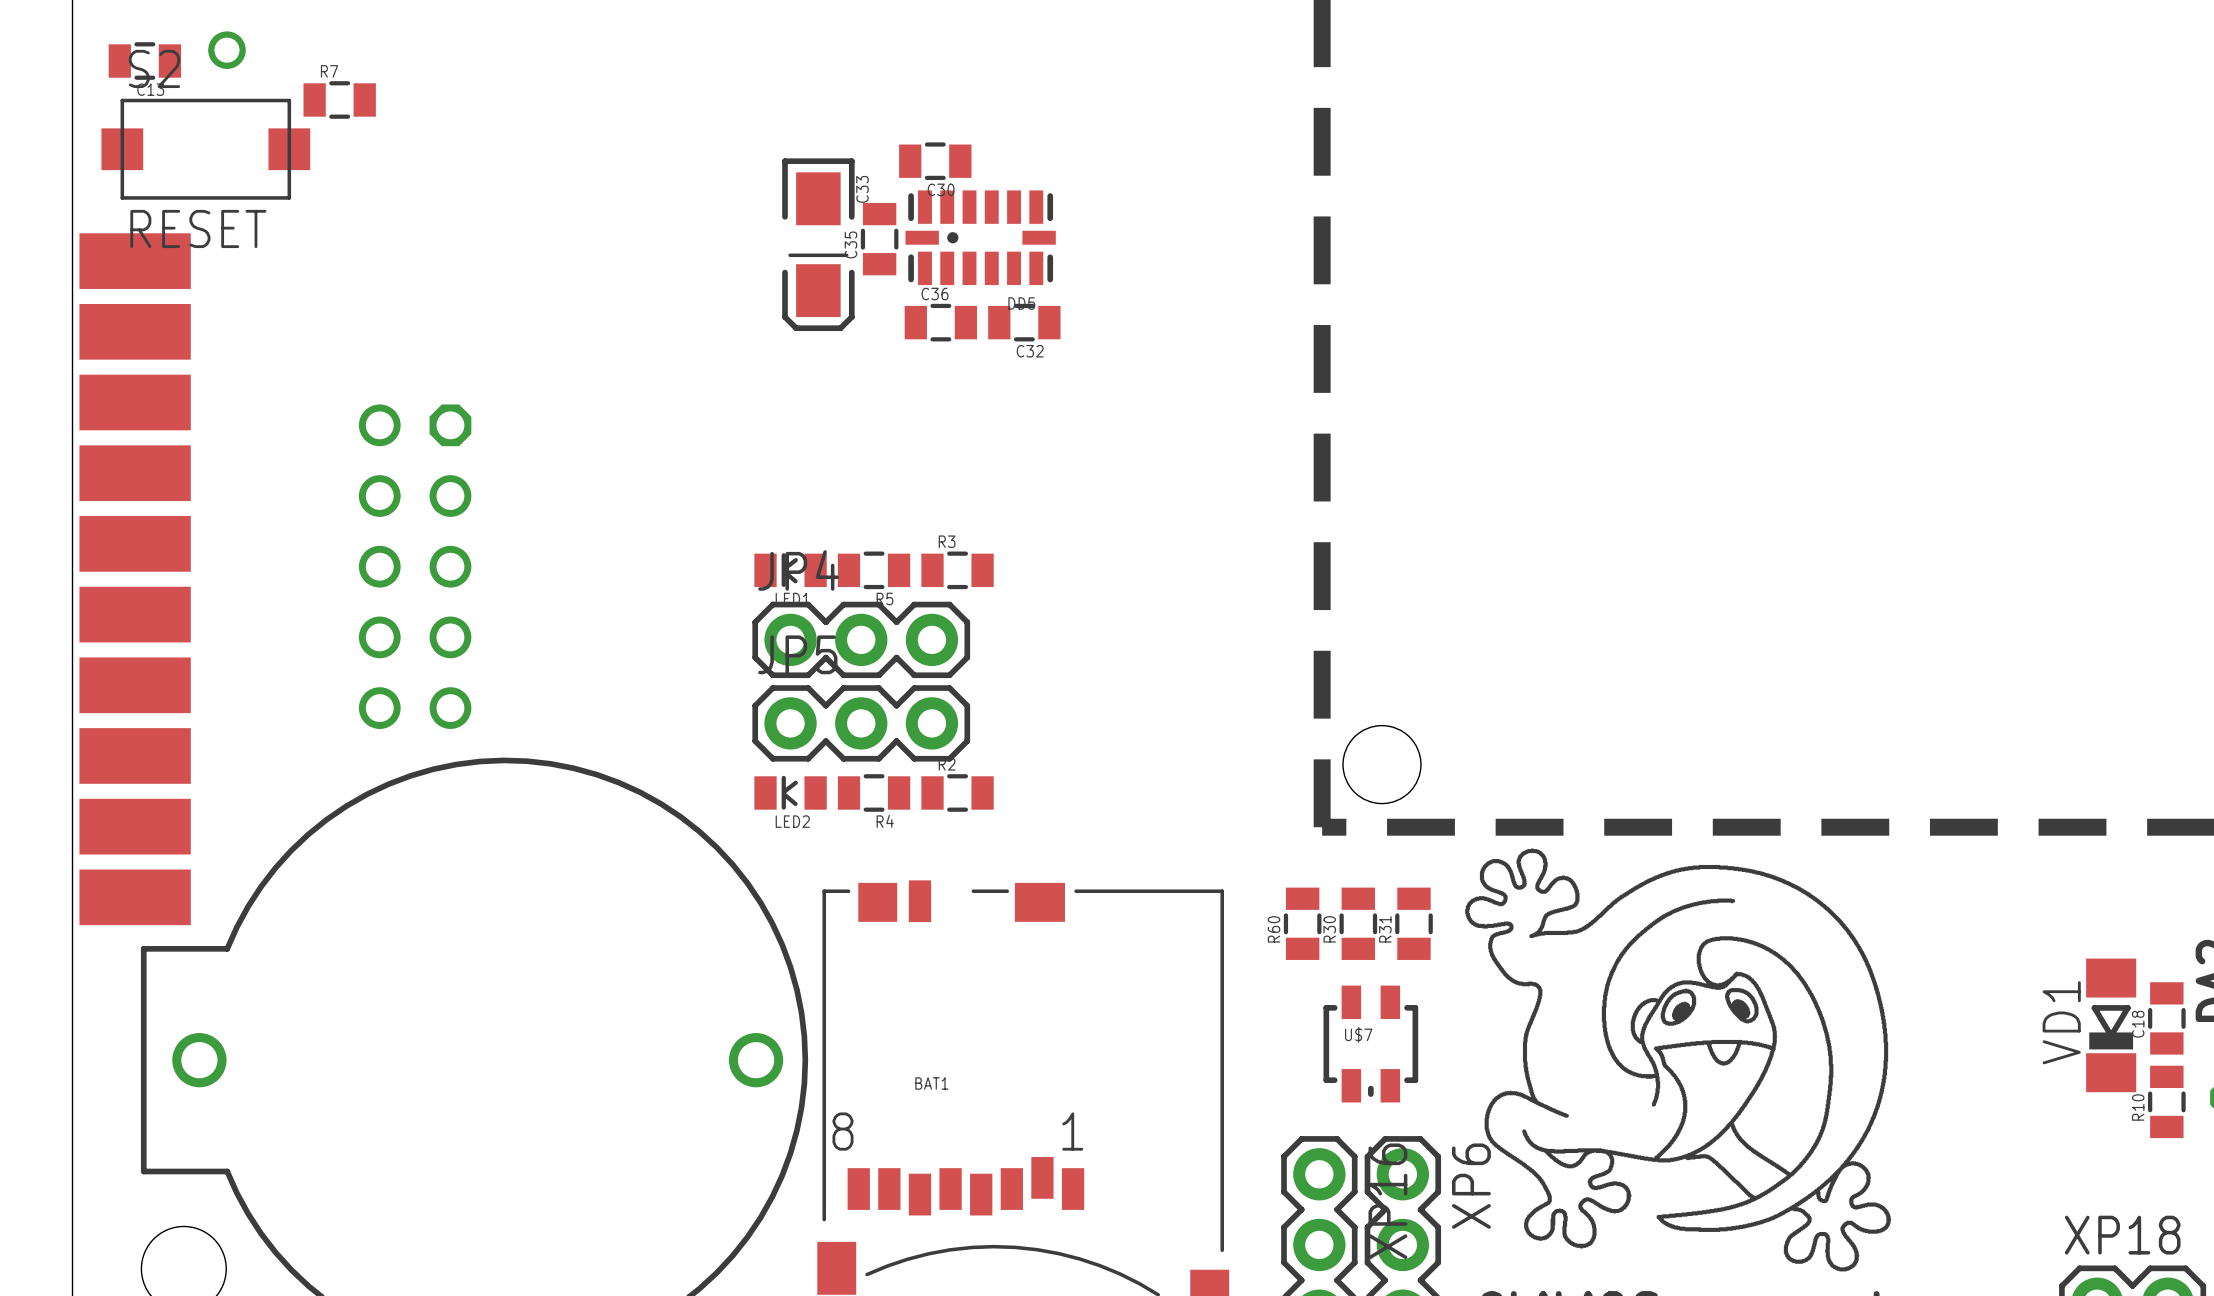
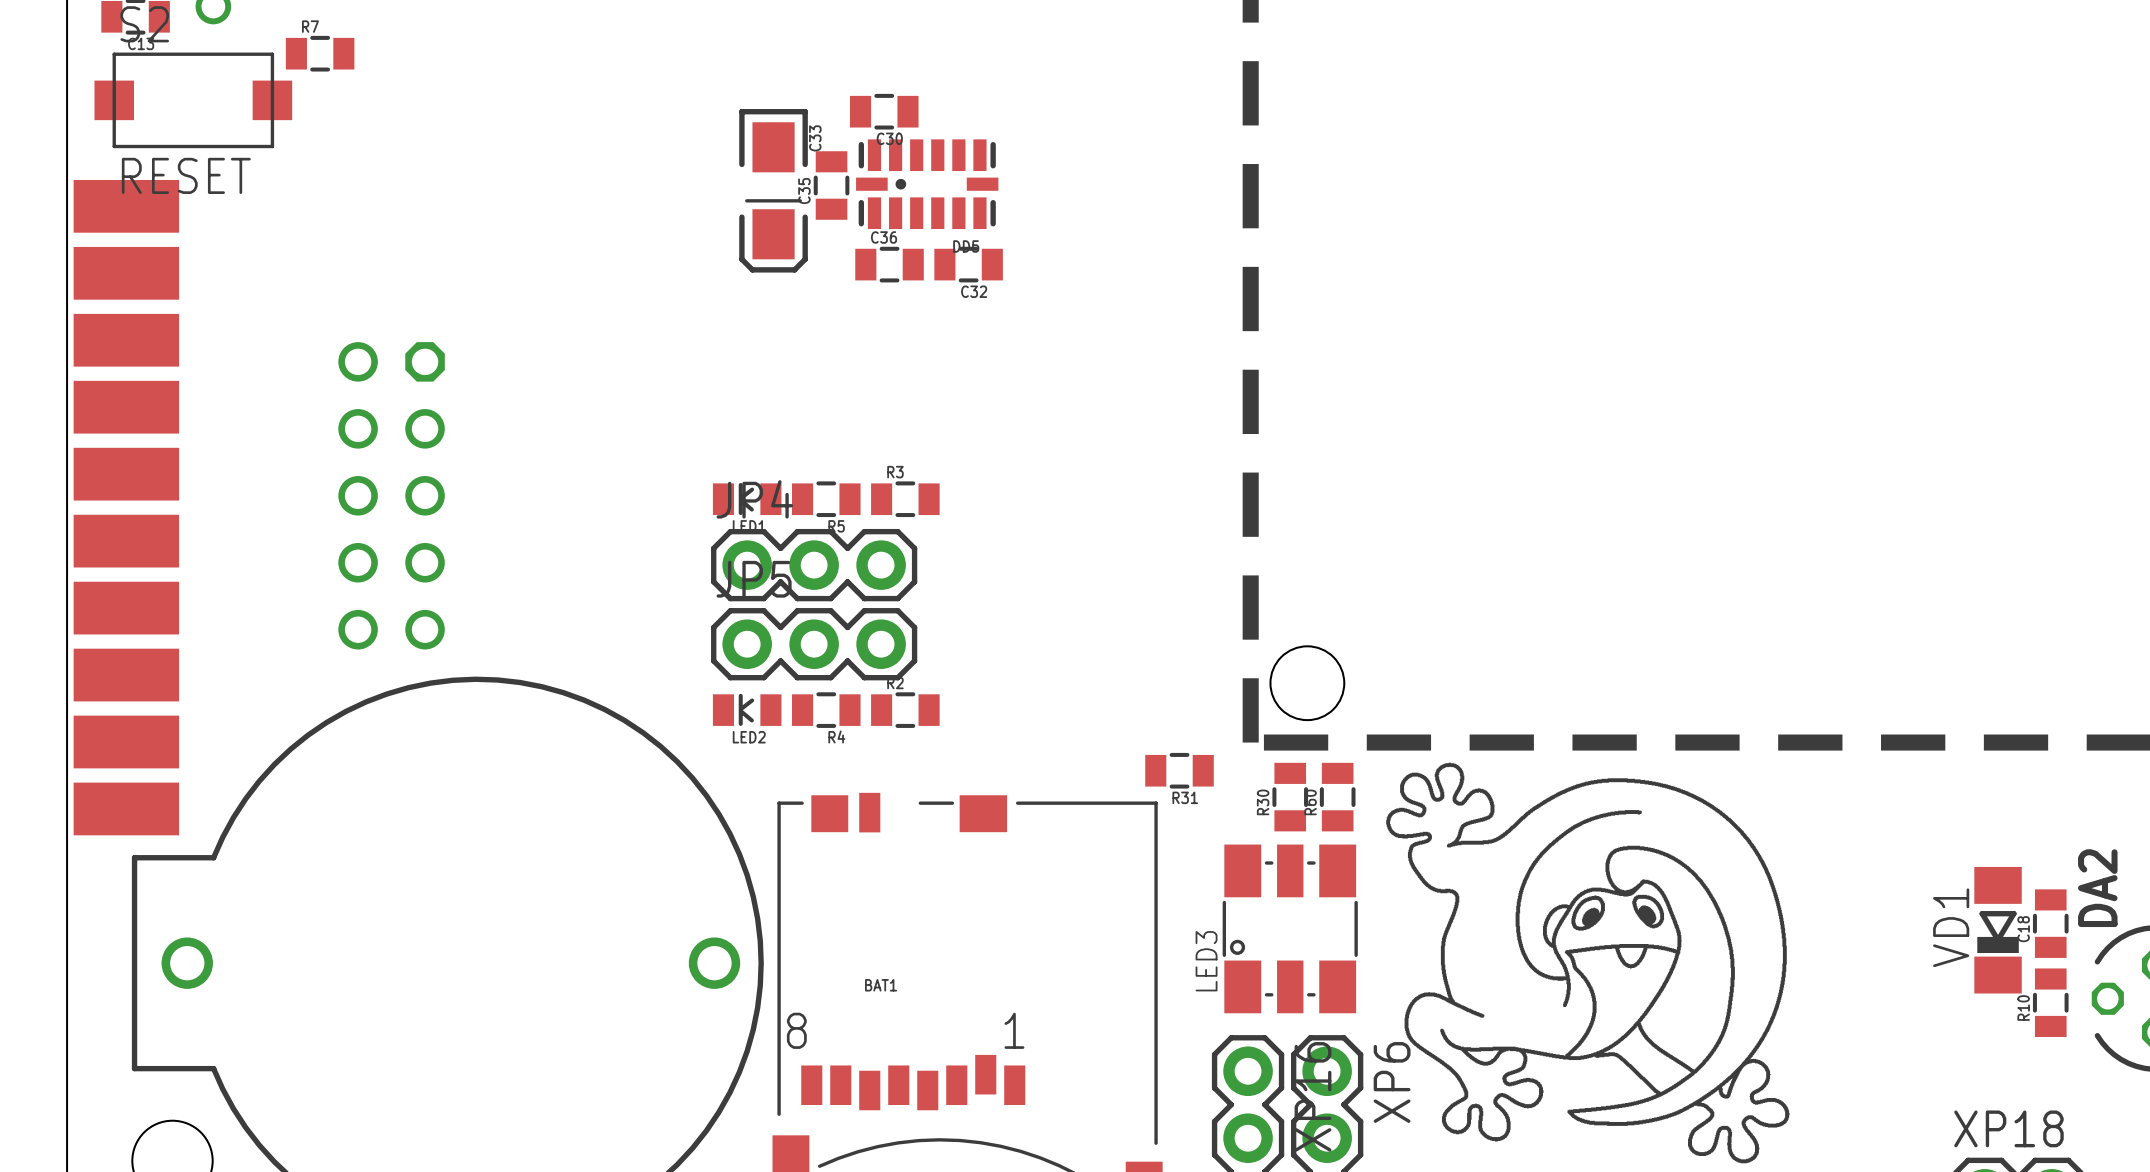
R60 position: (1302, 923) -> (1337, 797)
R30 position: (1358, 923) -> (1290, 797)
R31 rotation: 0° (1413, 923) -> 90° clockwise (1179, 770)
R31 position: (1413, 923) -> (1179, 770)
LED3: none -> (1290, 928)
U$7: (1370, 1044) -> none

